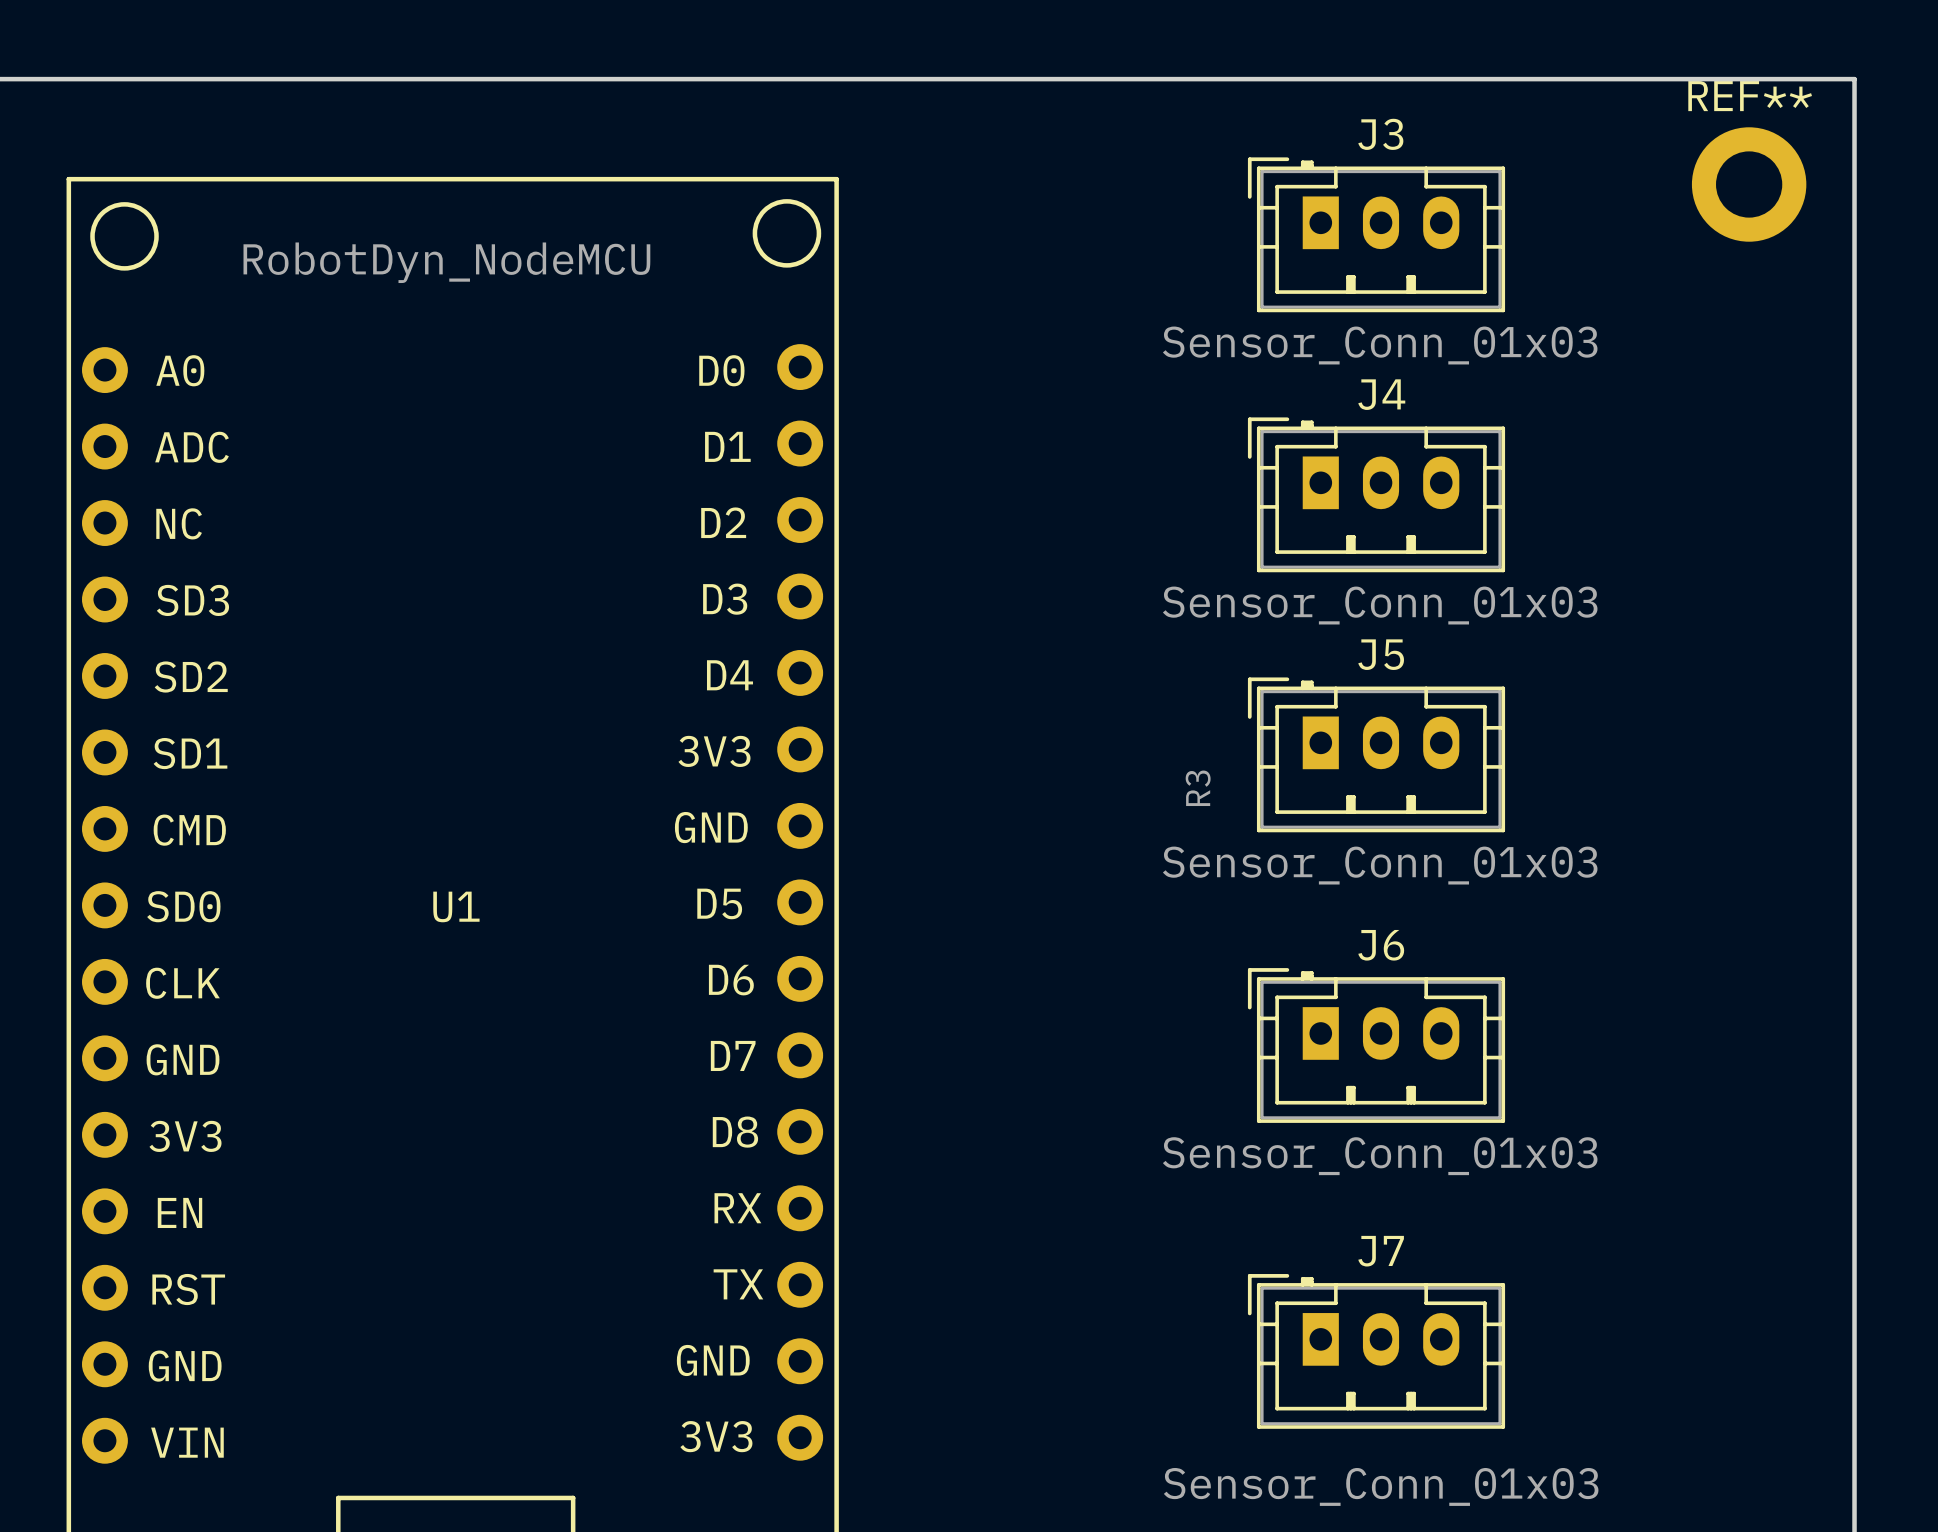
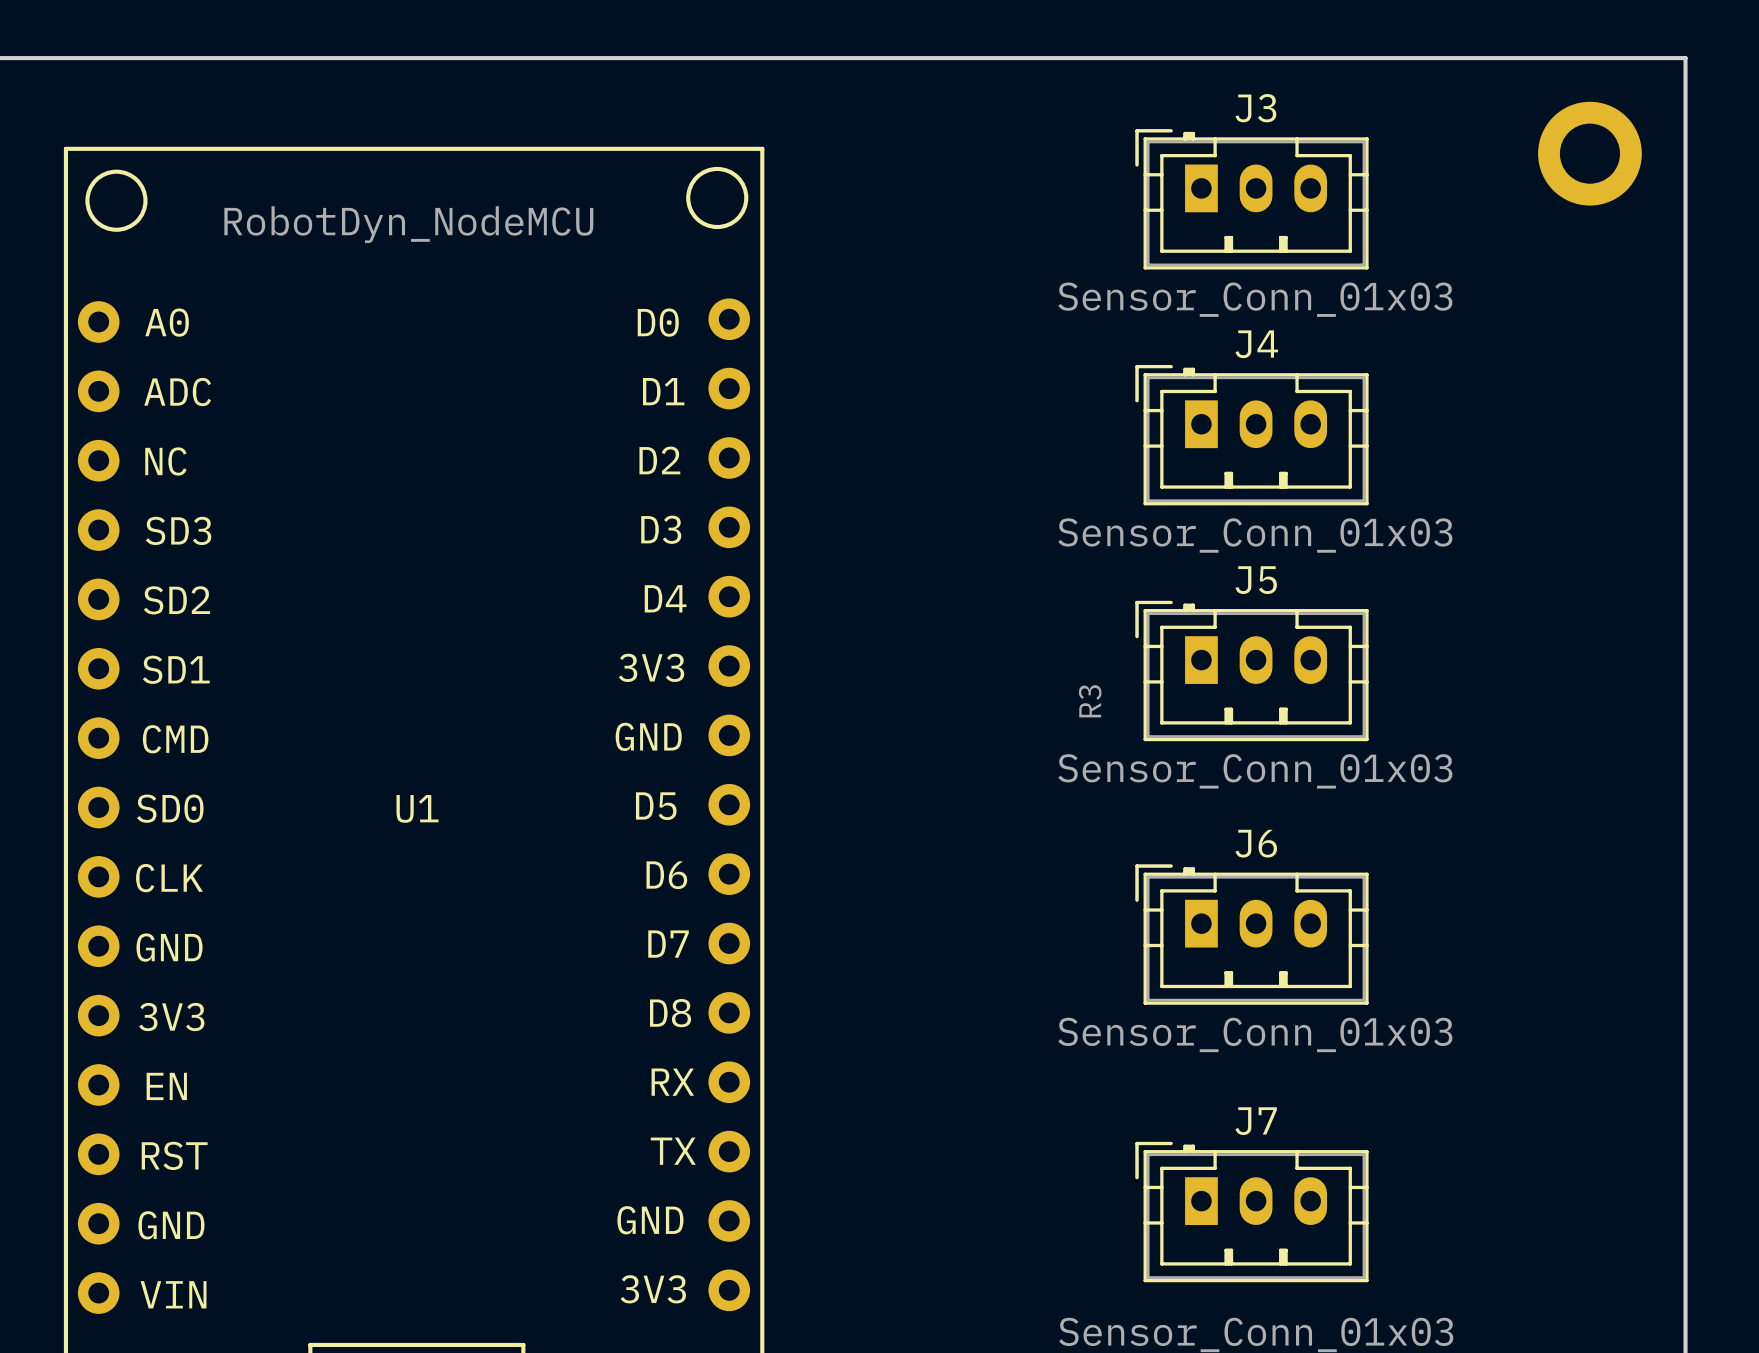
REF** name: REF** (1750, 96) -> none

